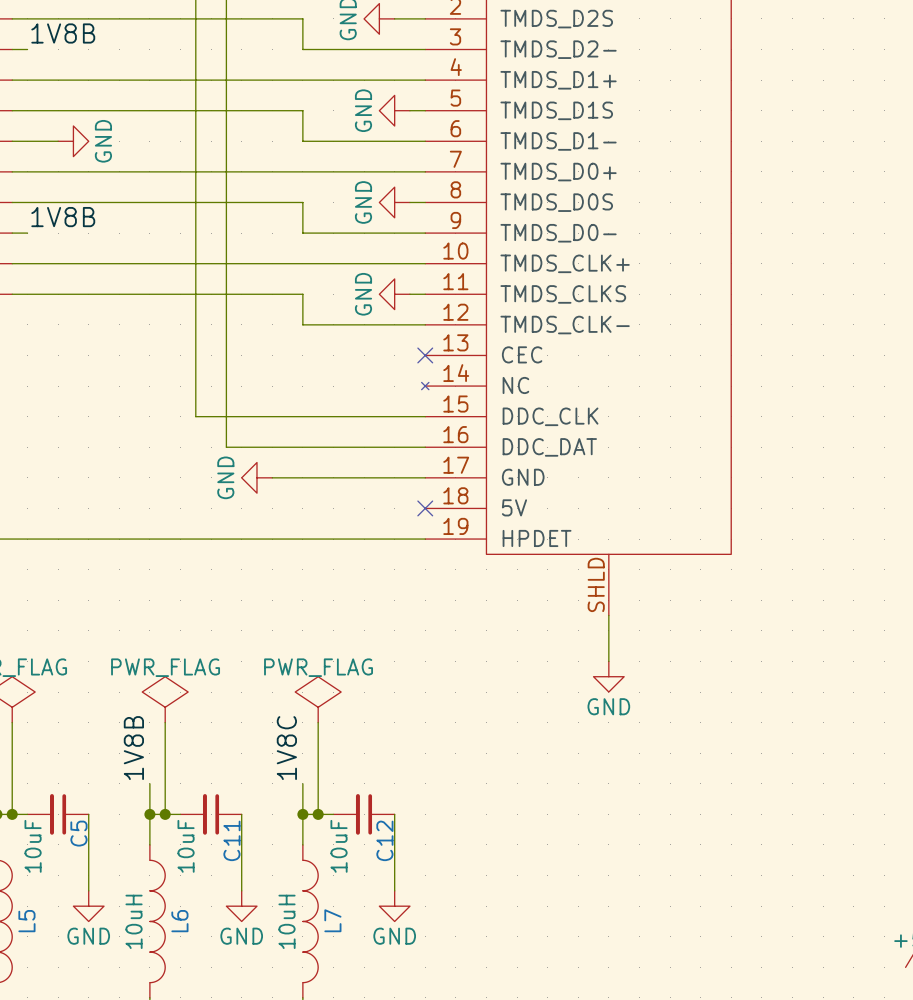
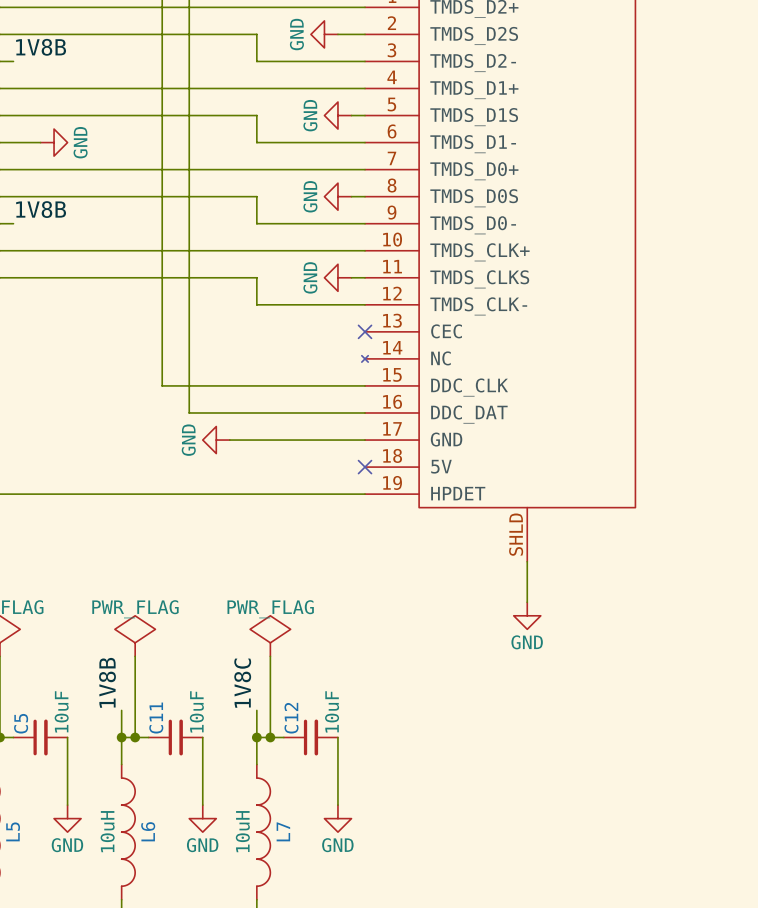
C5 rotation: 0° (58, 814) -> 180° (40, 737)
C11 rotation: 0° (211, 814) -> 180° (175, 737)
C12 rotation: 0° (364, 814) -> 180° (311, 737)

